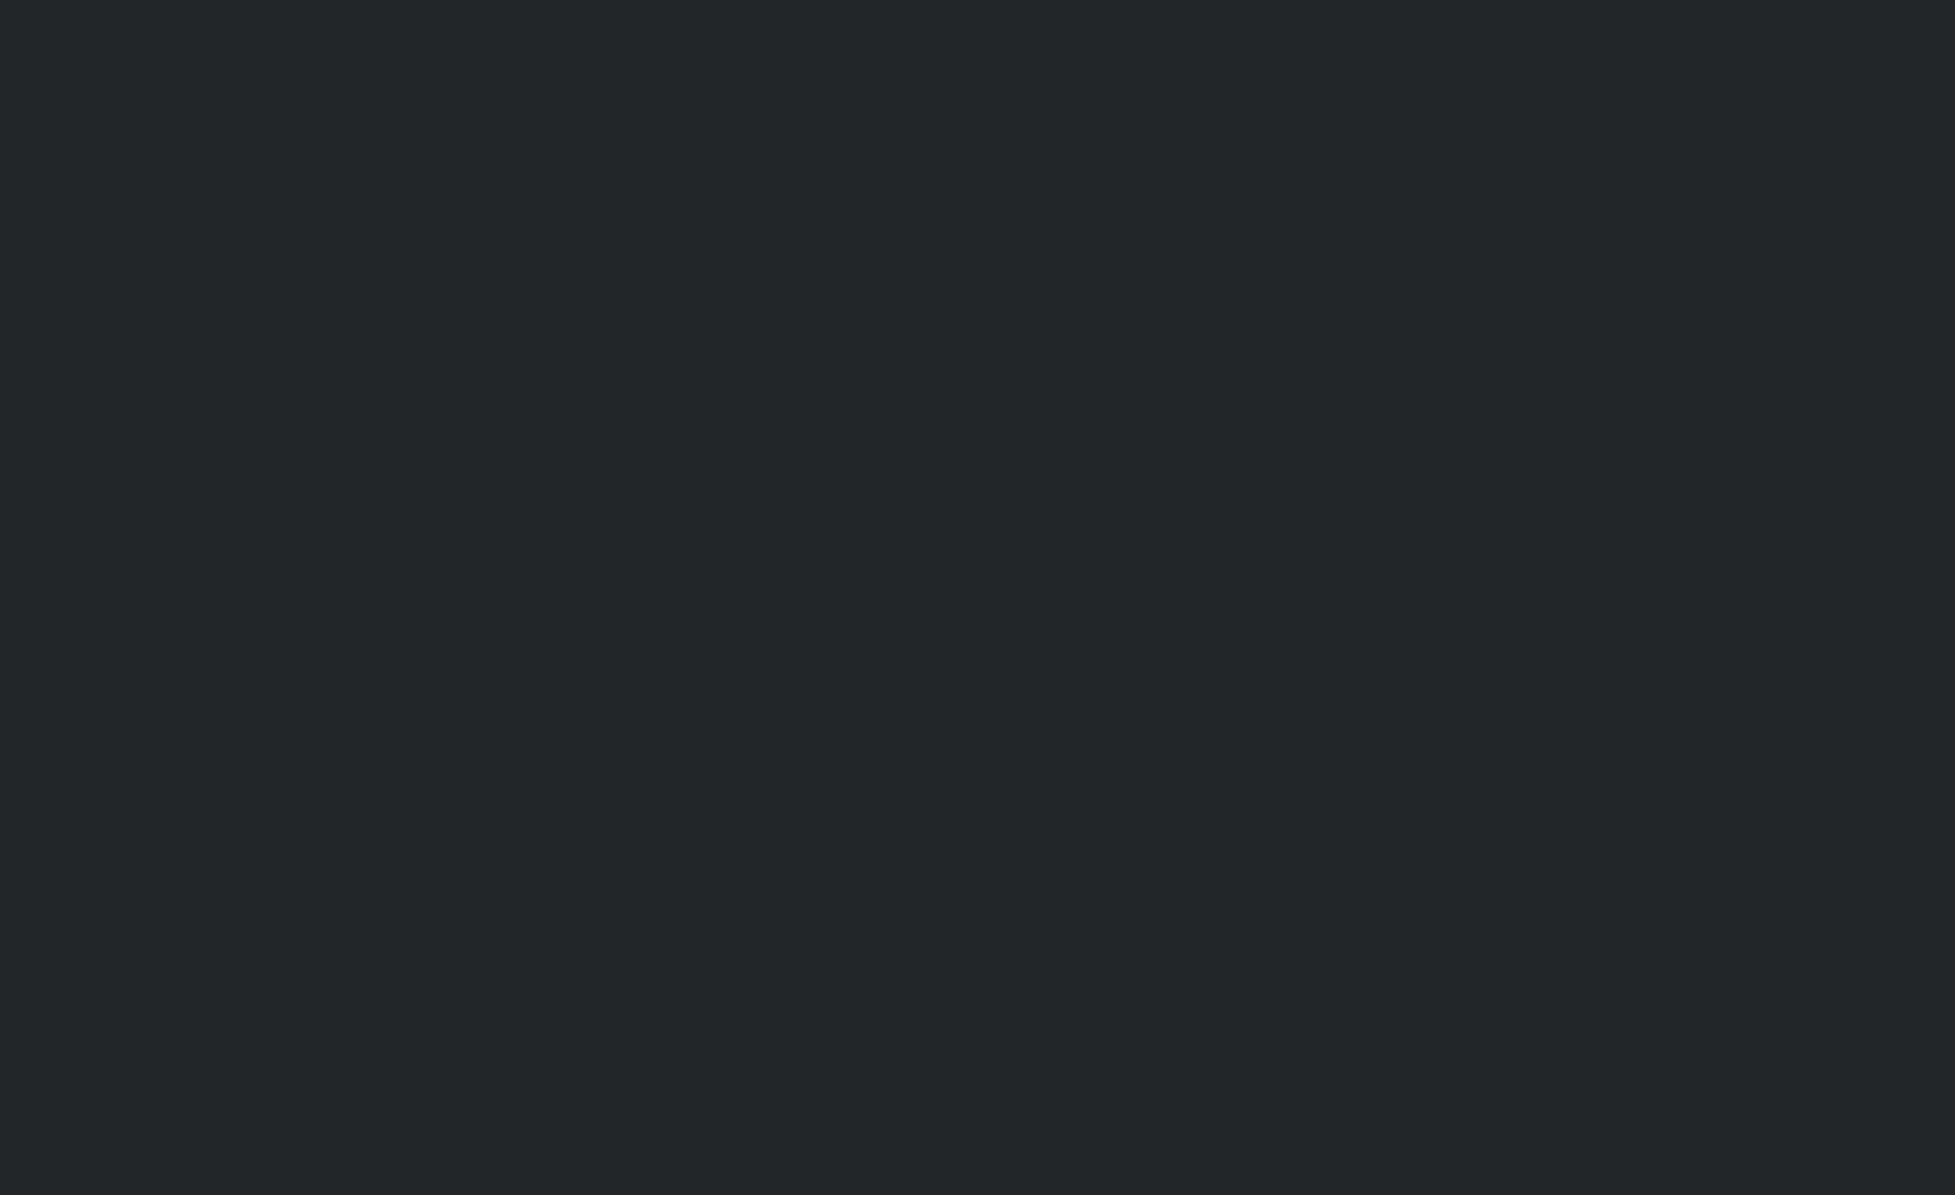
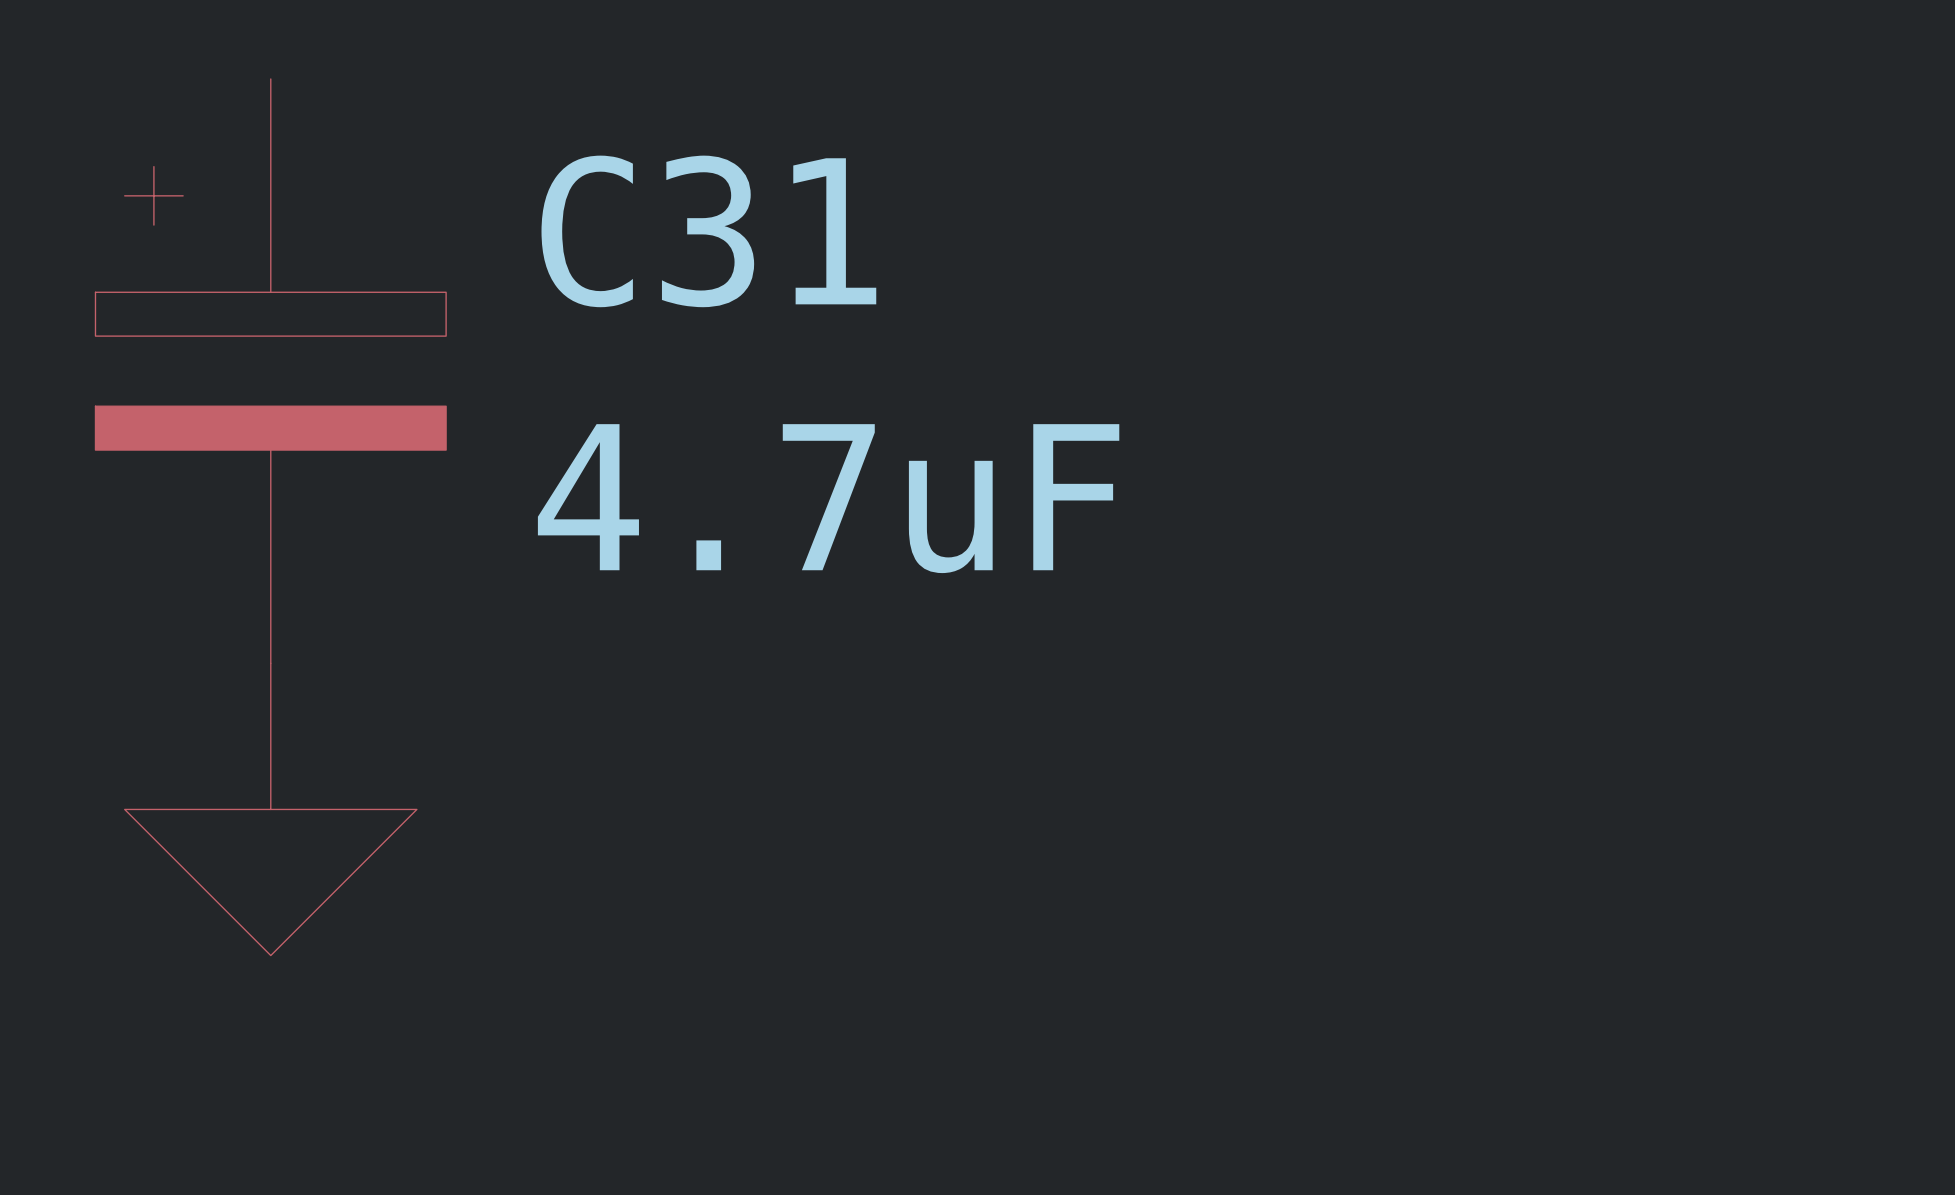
C31: none -> 4.7uF (270, 371)
power symbol: none -> (270, 809)

